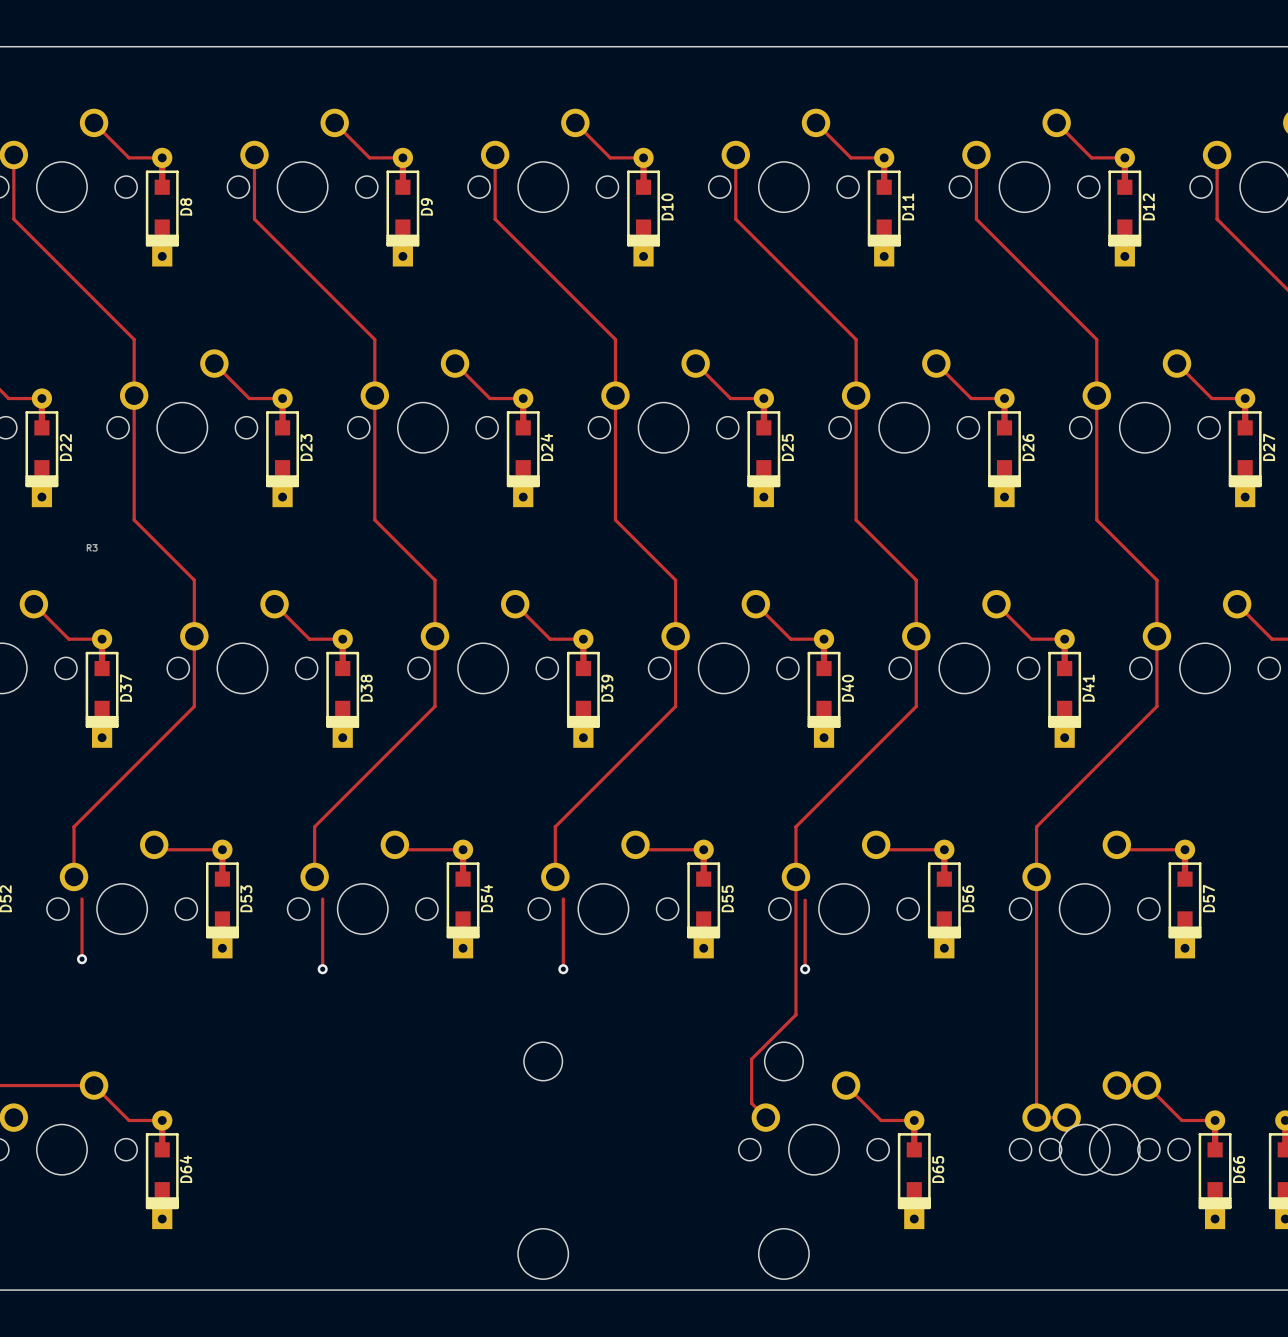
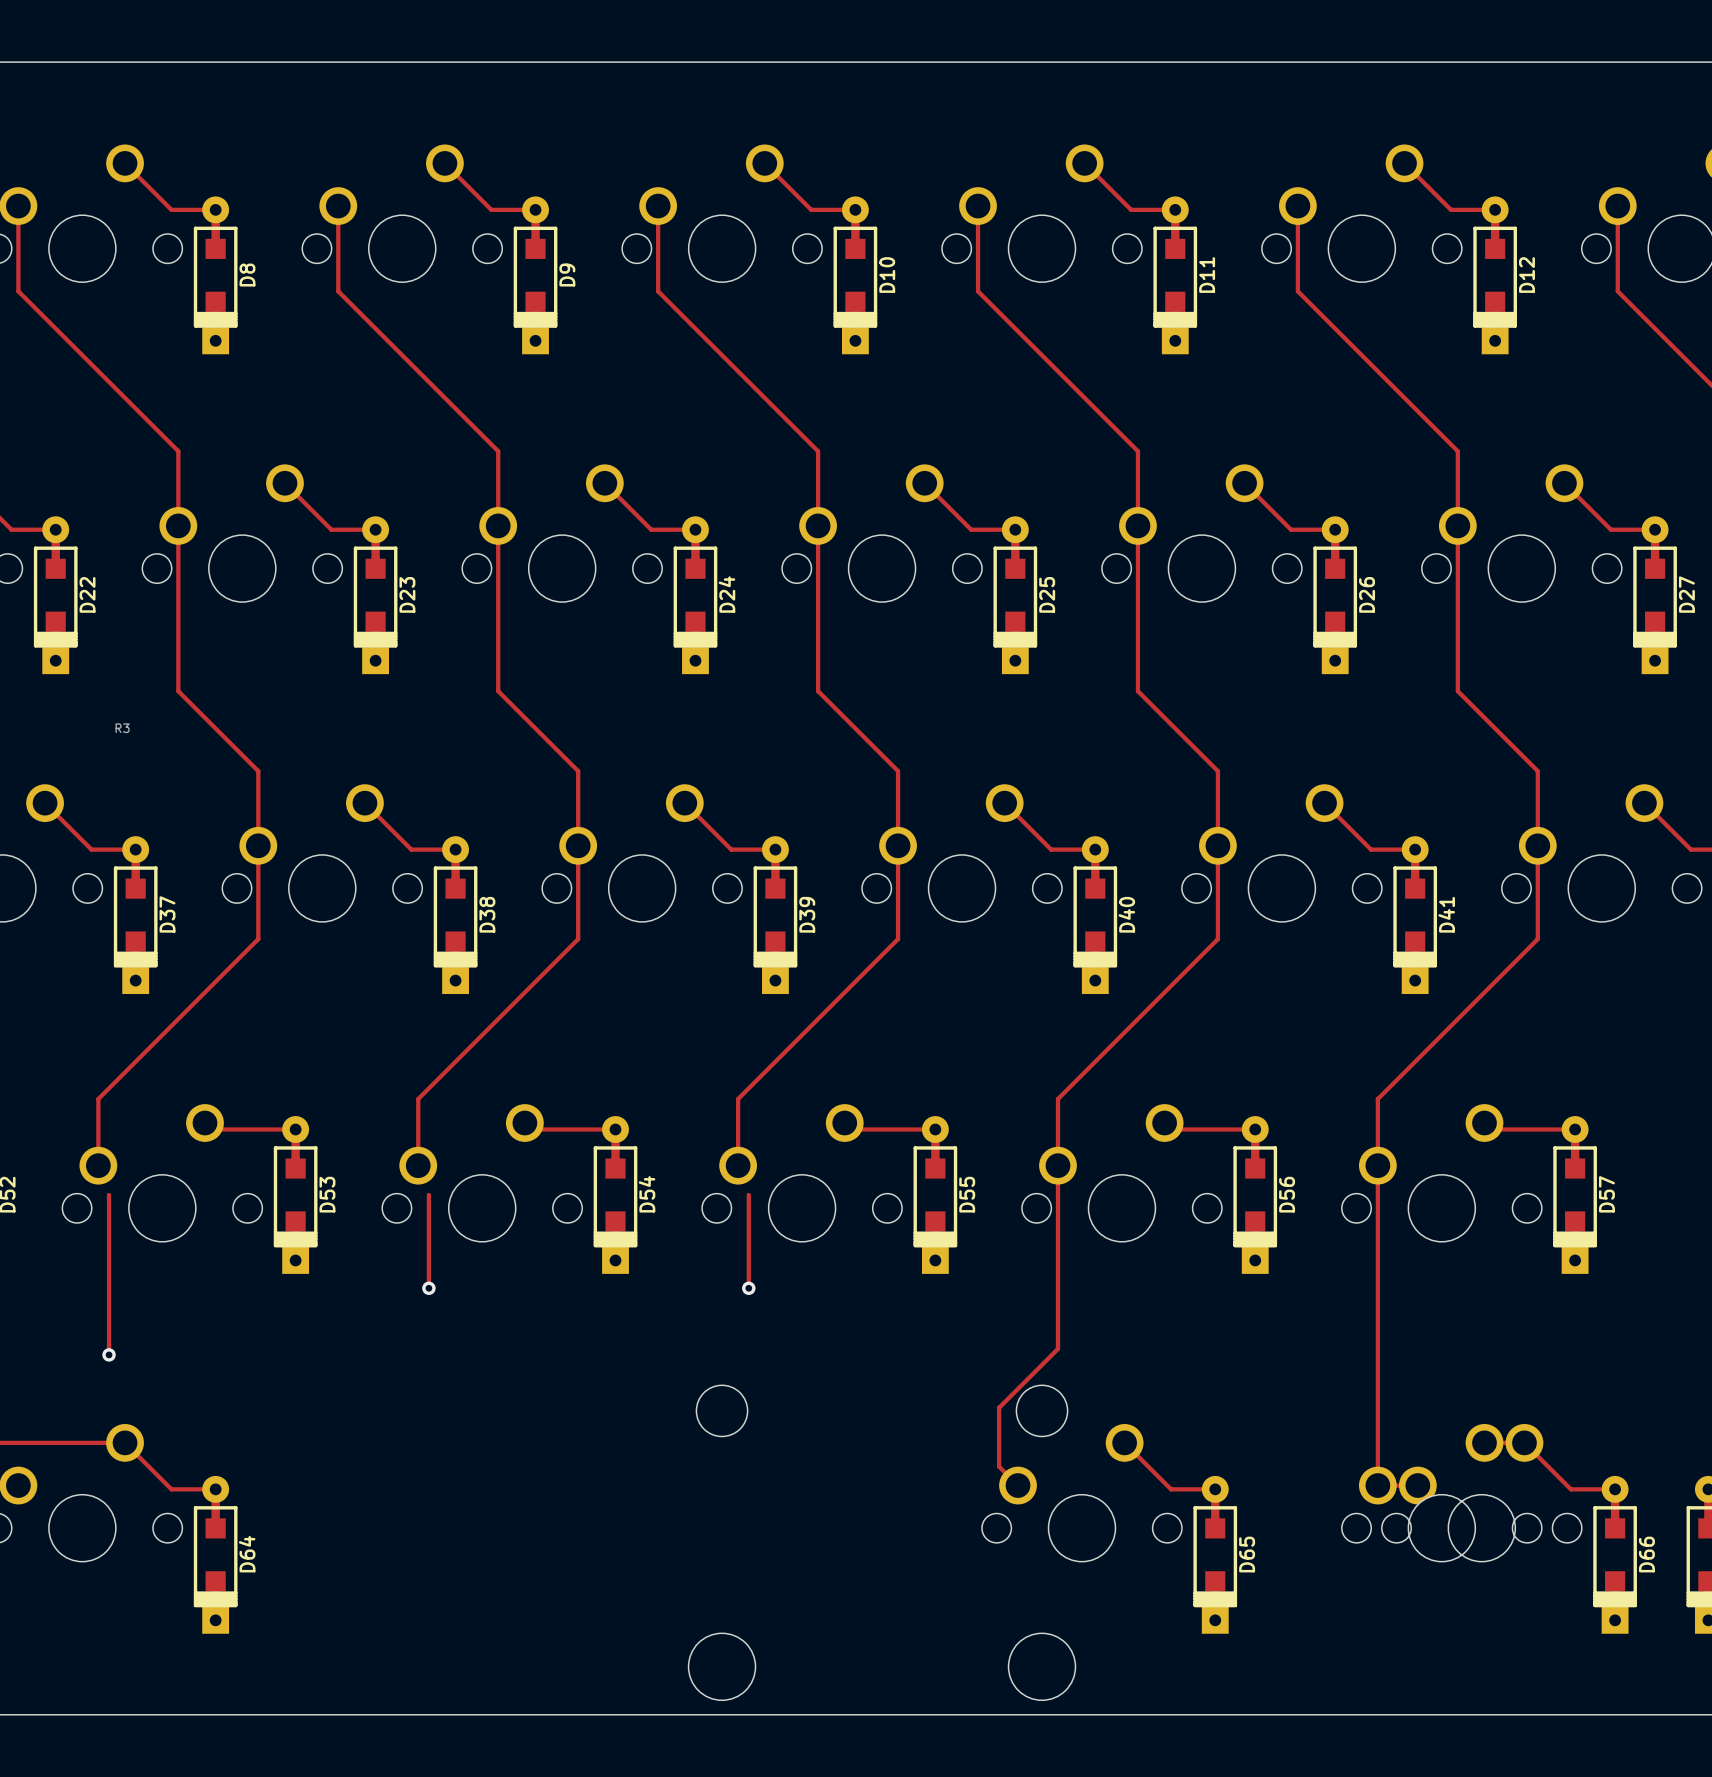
track: (805, 900) (805, 969) -> none
track: none -> (109, 1274) (109, 1354)
via position: (82, 959) -> (109, 1354)
via: (805, 969) -> none

